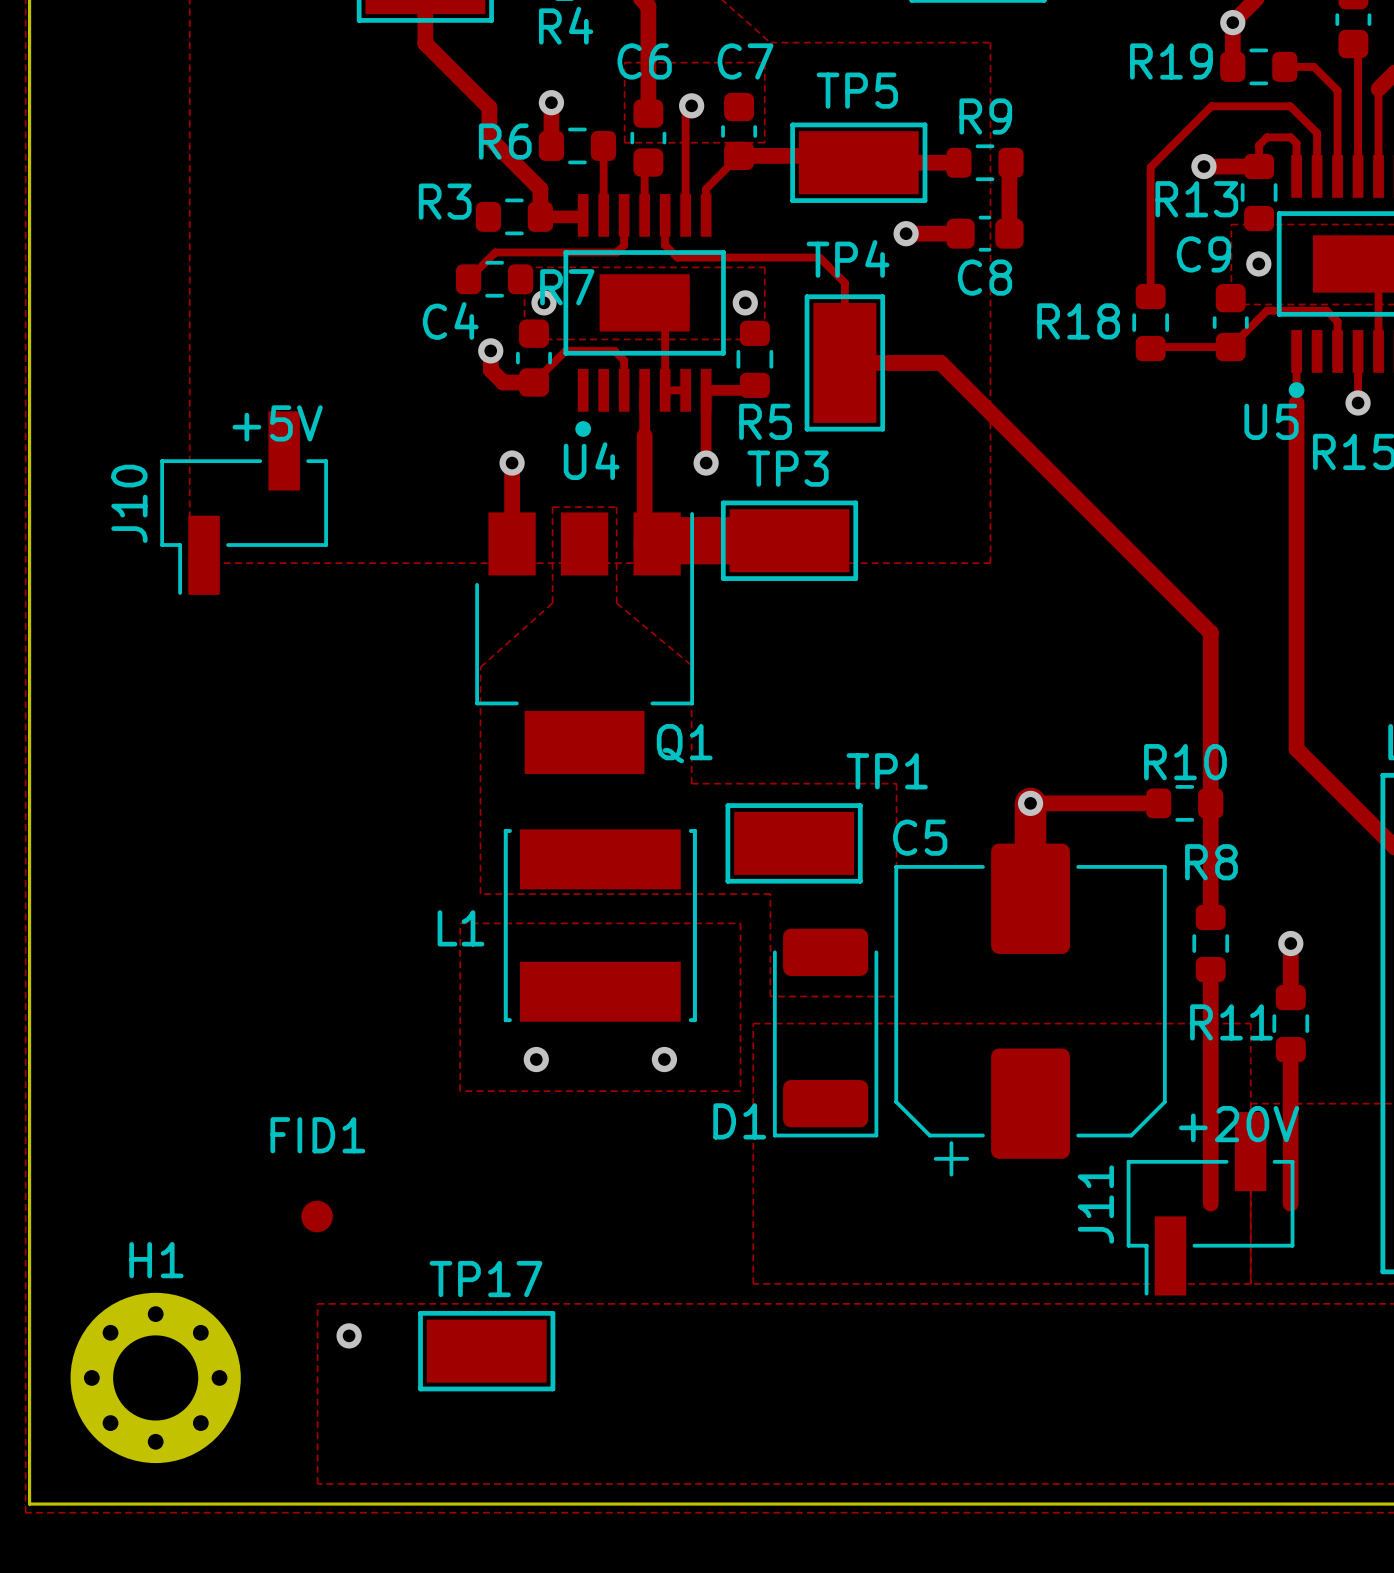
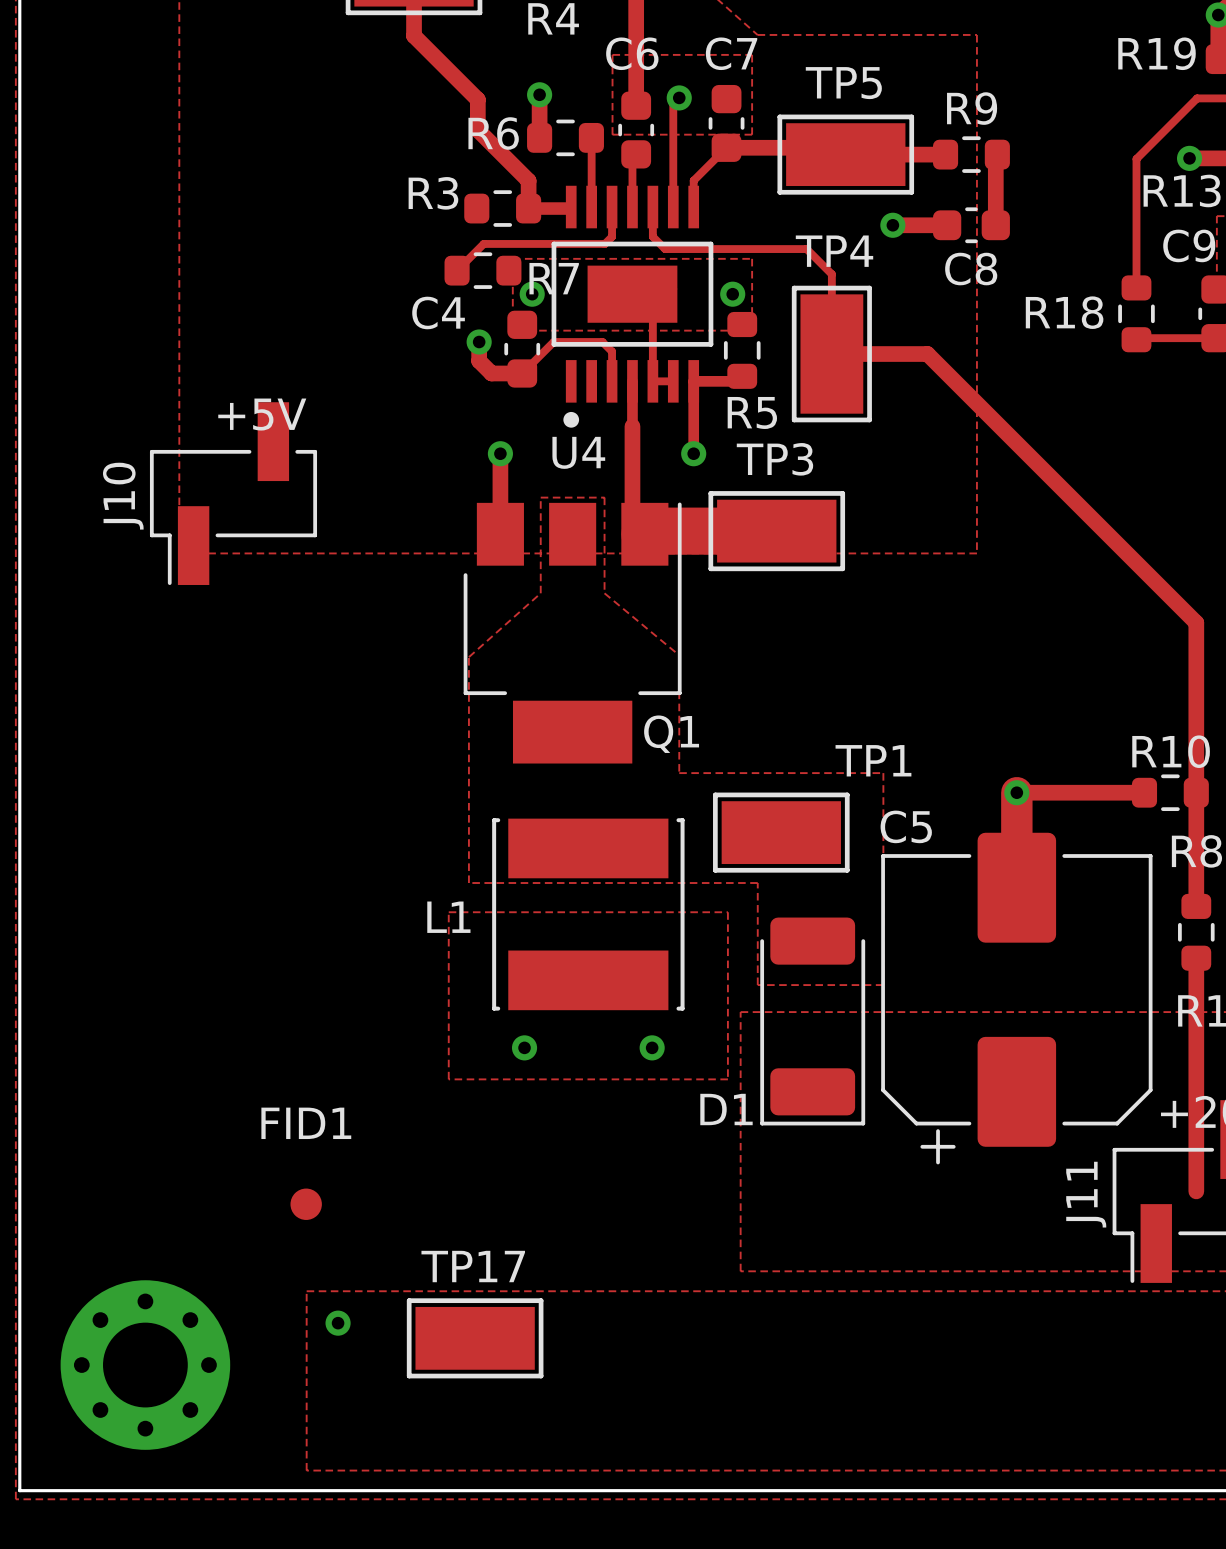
H1 name: H1 (156, 1260) -> none

